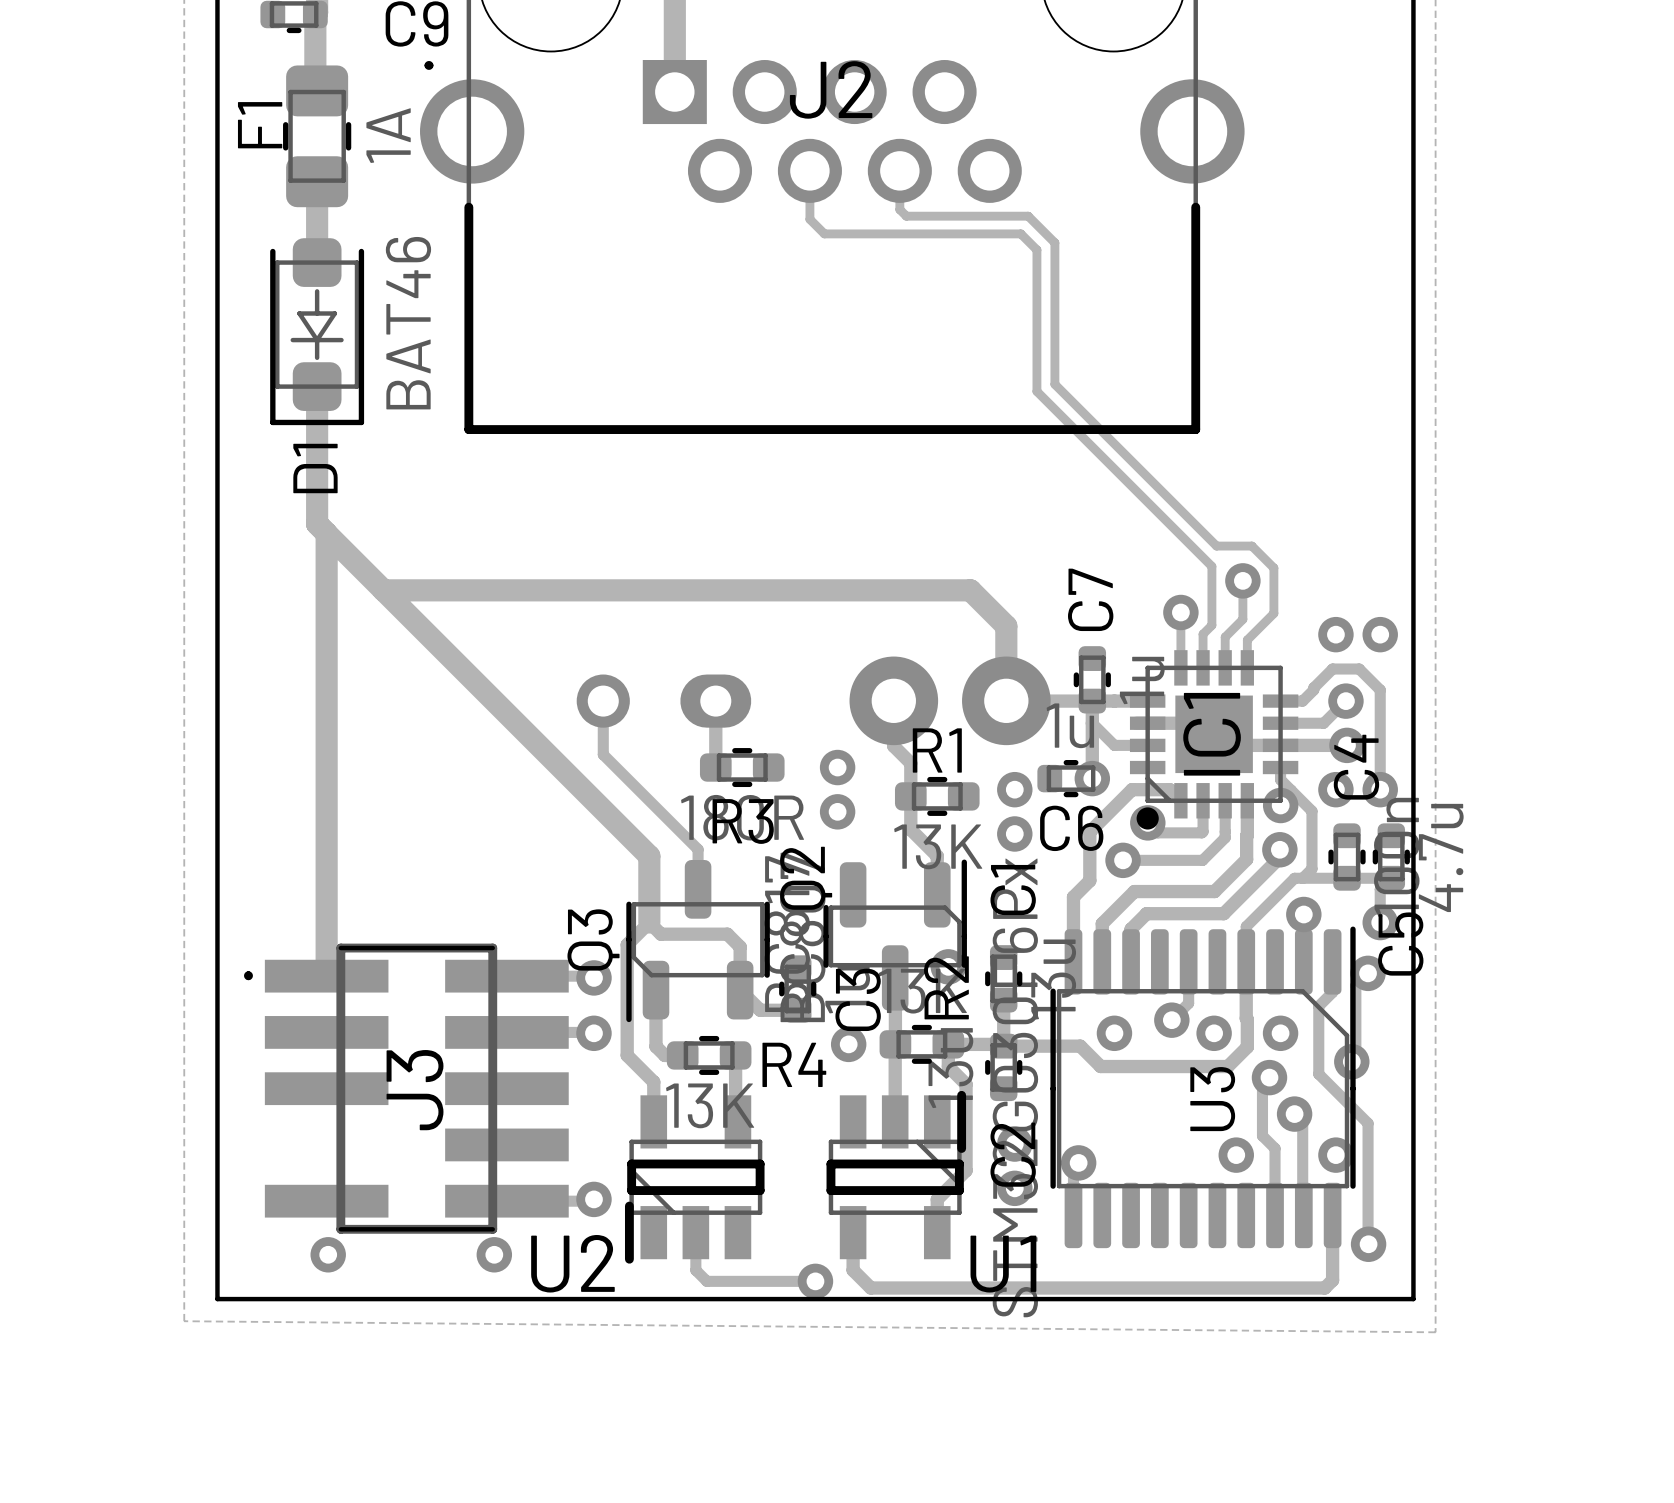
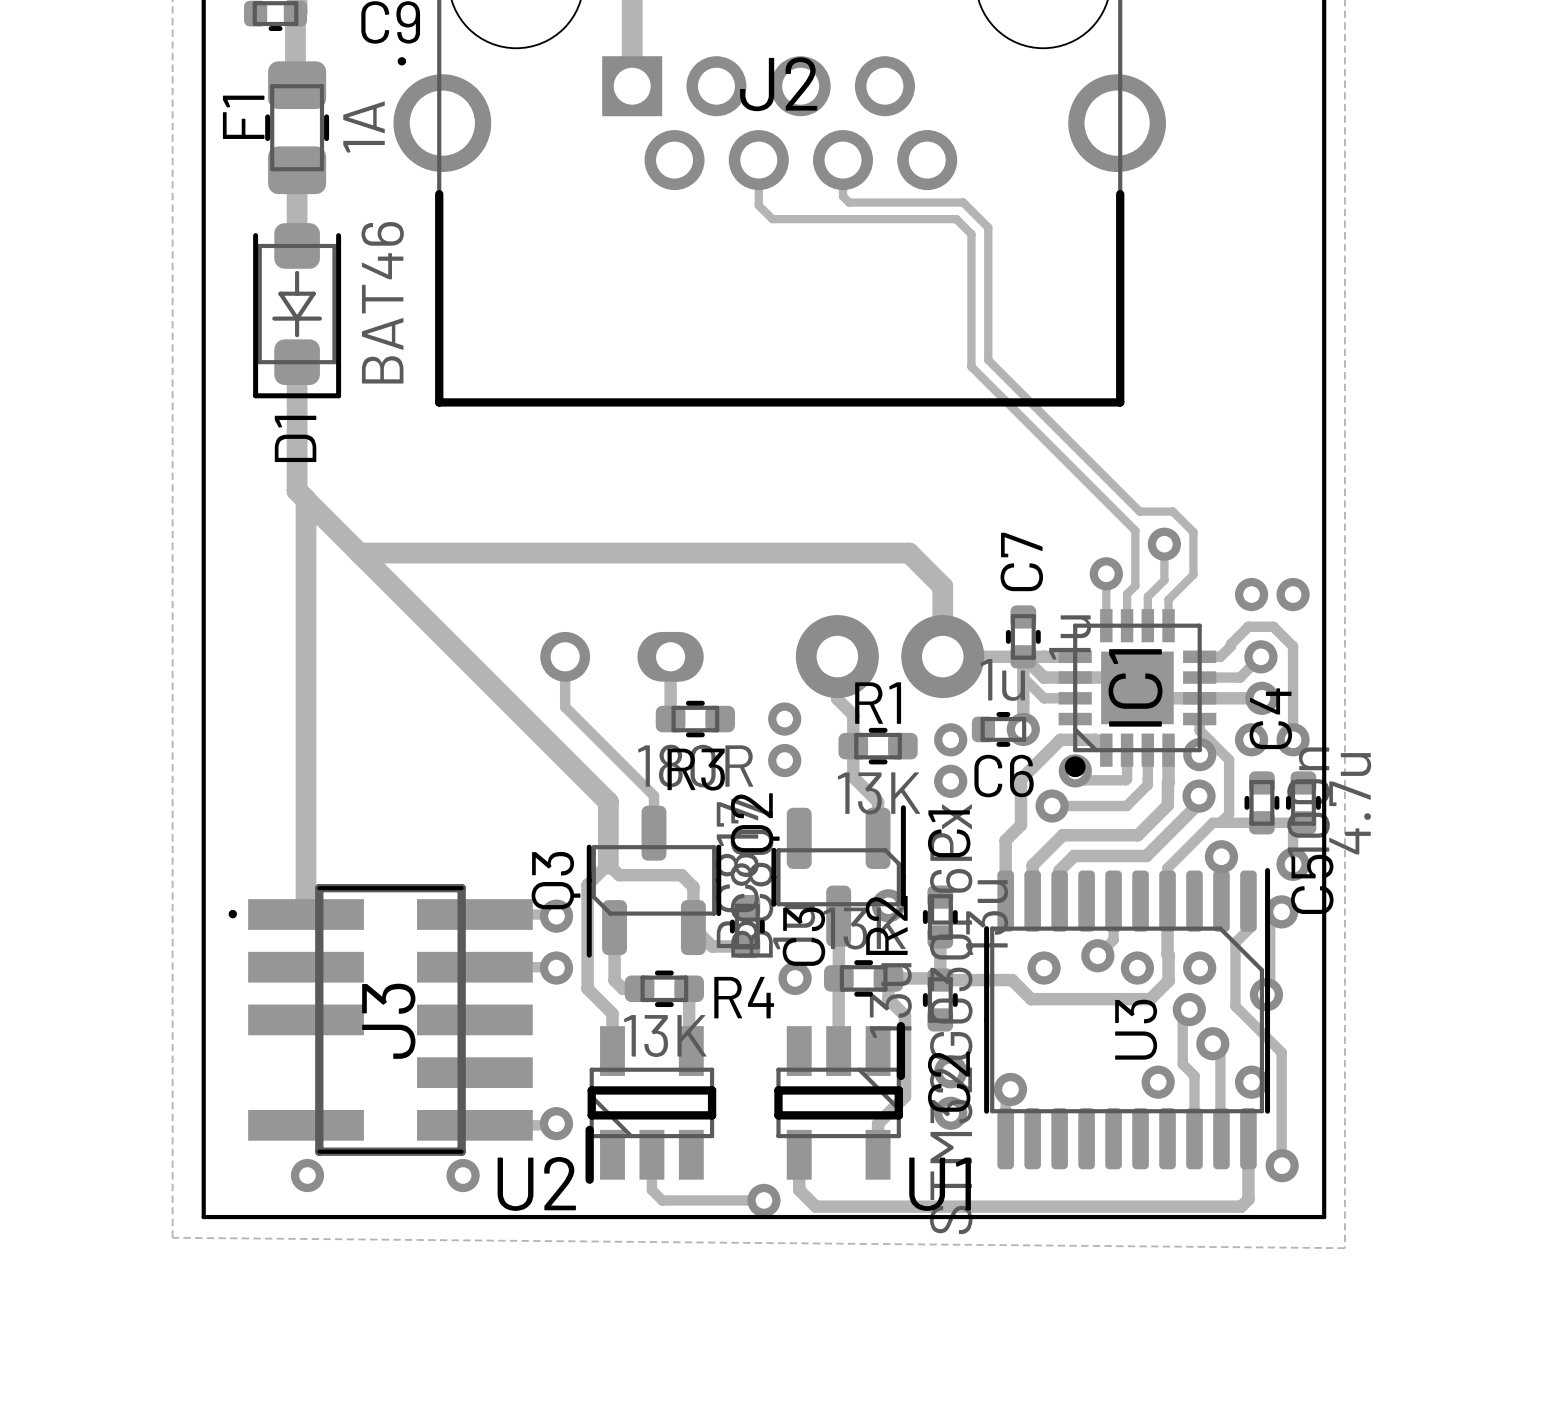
track: none -> (1023, 656) (1044, 677) (1064, 677)

